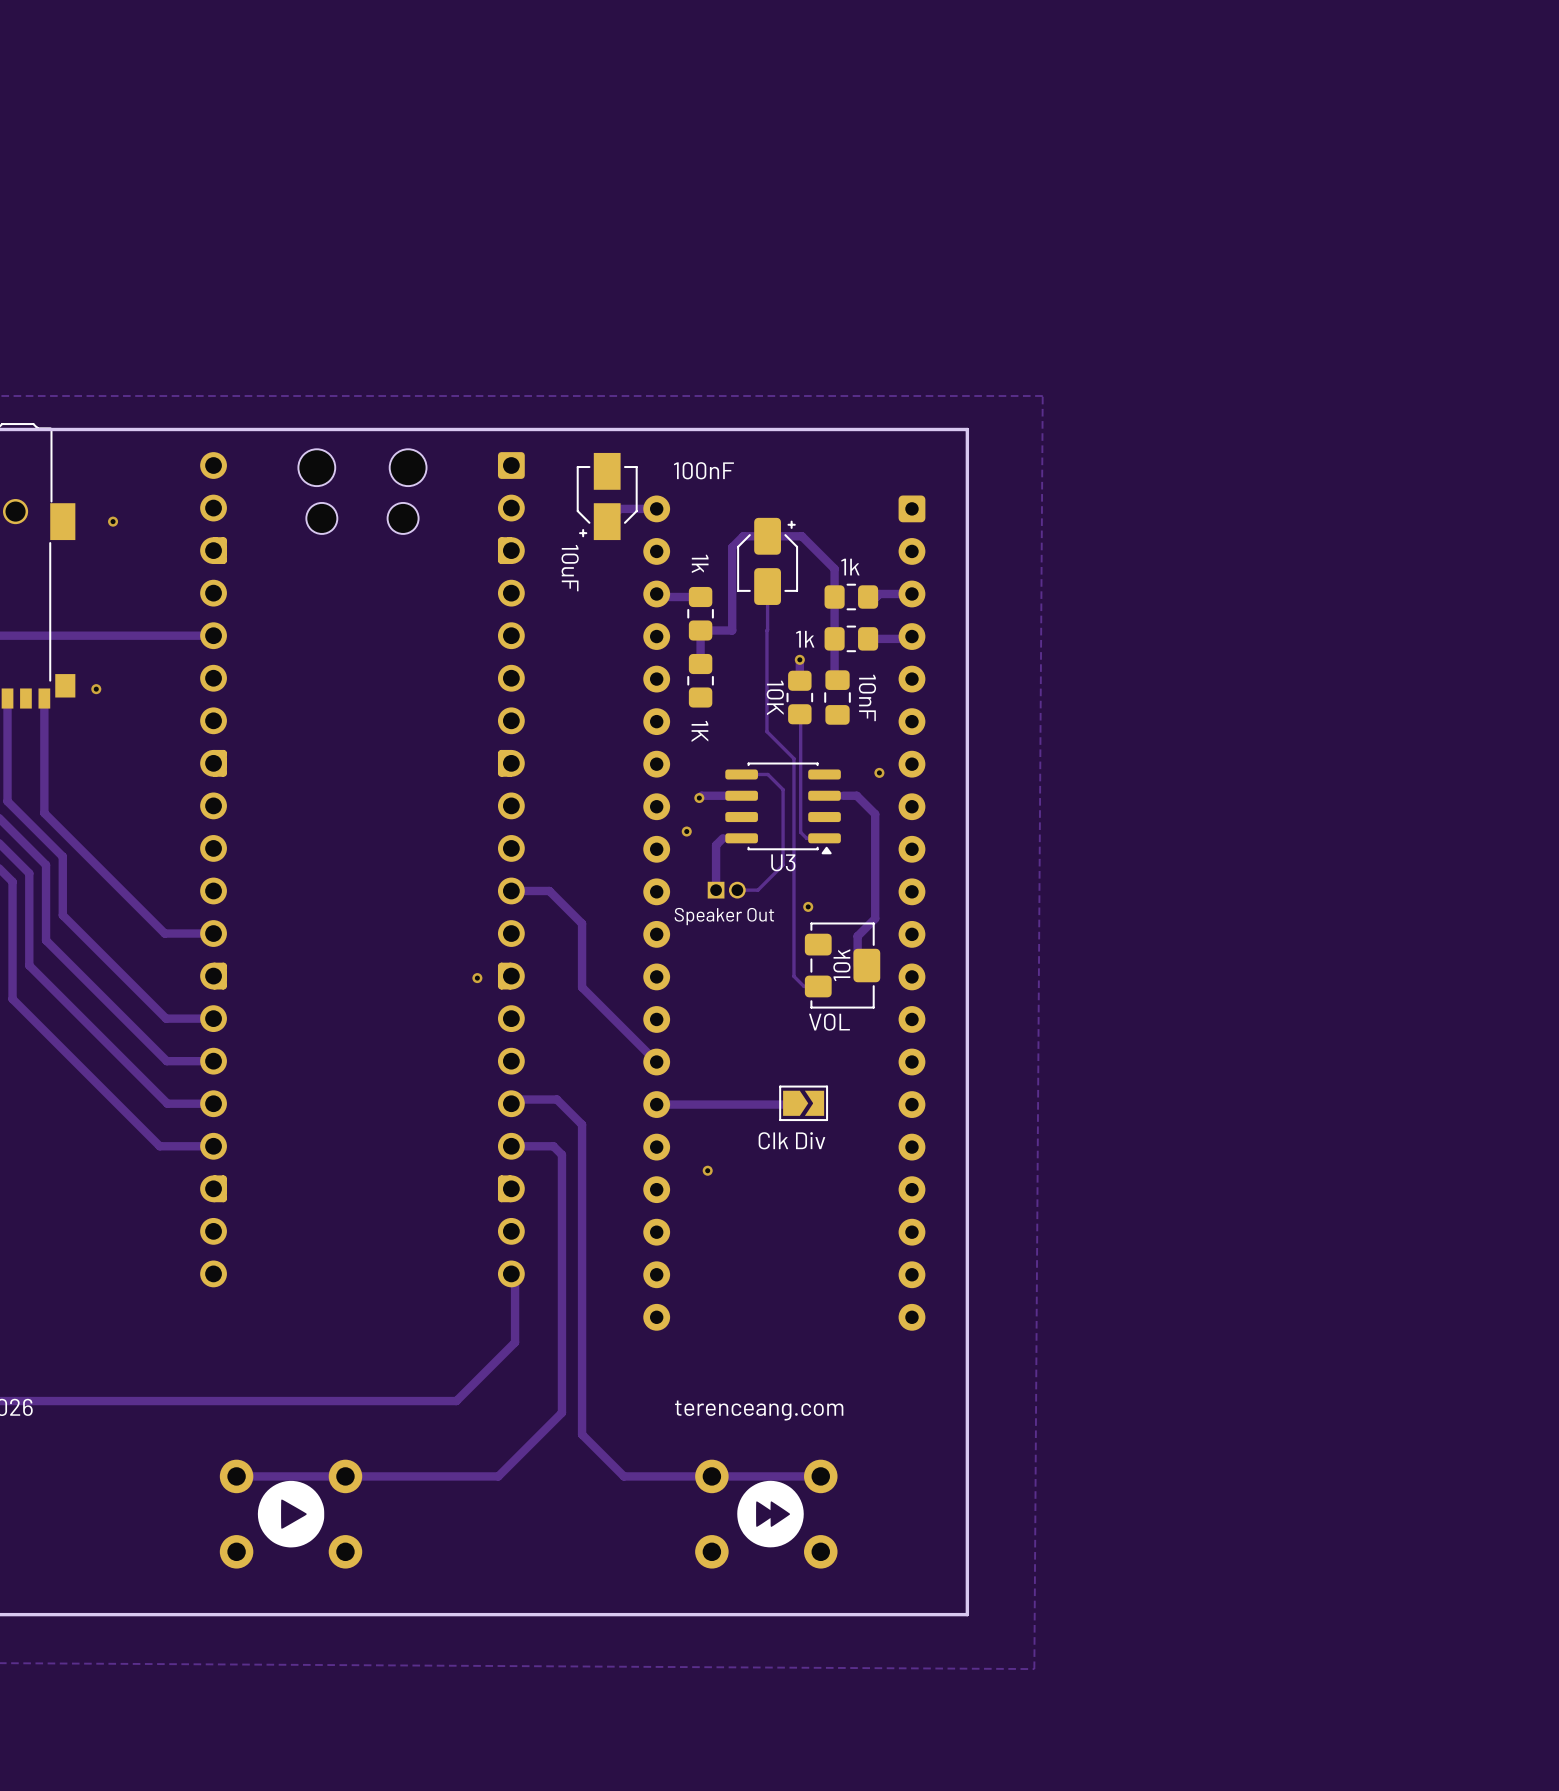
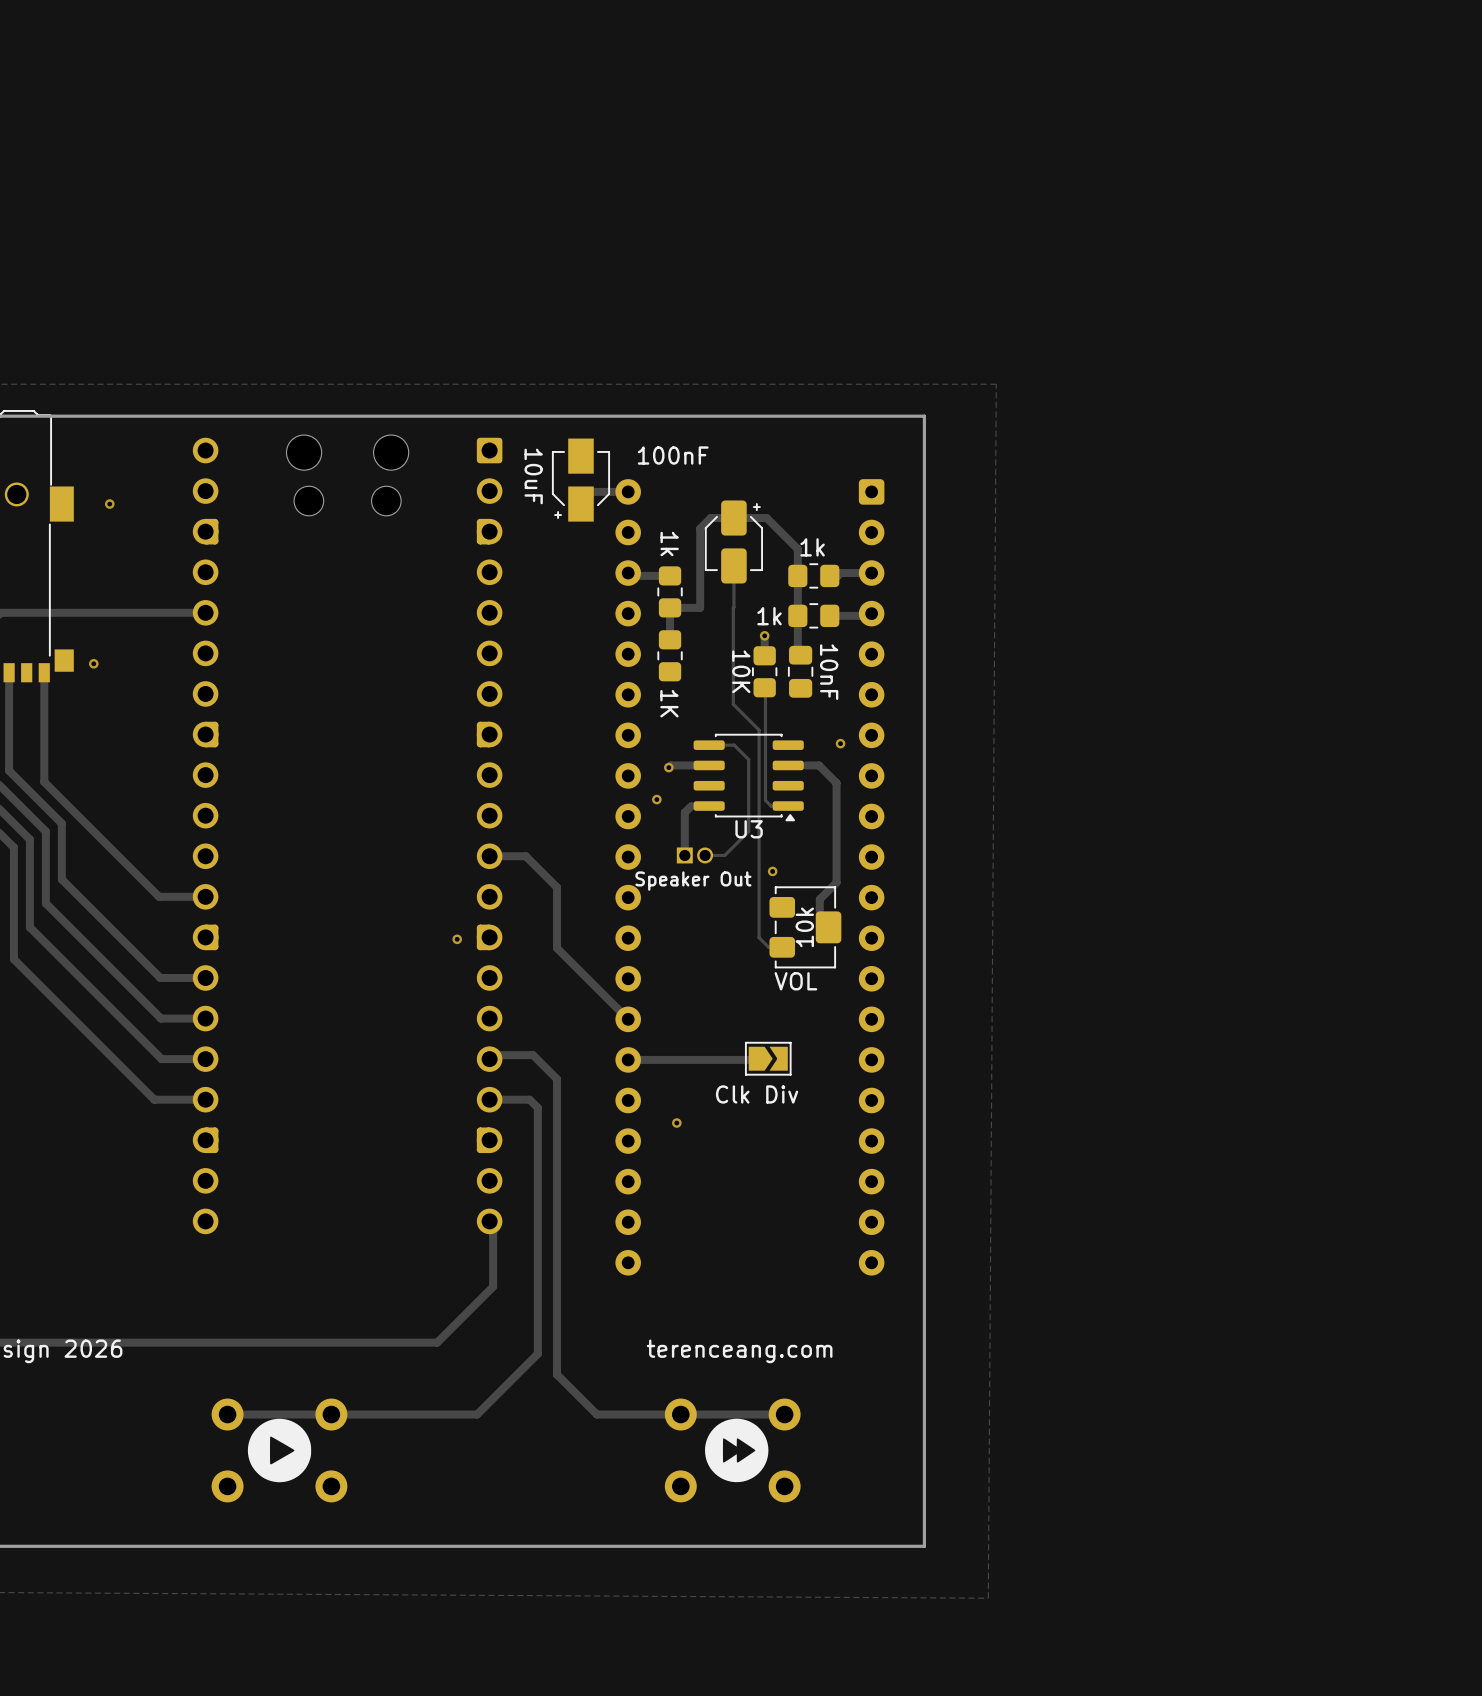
part value position: 10uF (570, 568) -> 10uF (533, 476)

